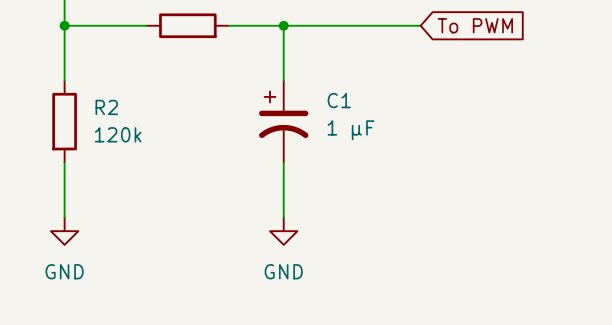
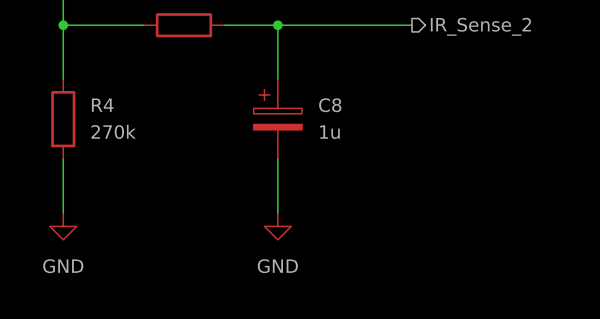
global label: To PWM (475, 25) -> none
hierarchical label: none -> IR_Sense_2 (480, 26)
R2 name: R2 (106, 107) -> R4 (102, 105)
C1: 1 μF (283, 121) -> none
C8: none -> 1u (277, 119)
R2 value: 120k (118, 134) -> 270k (113, 131)

